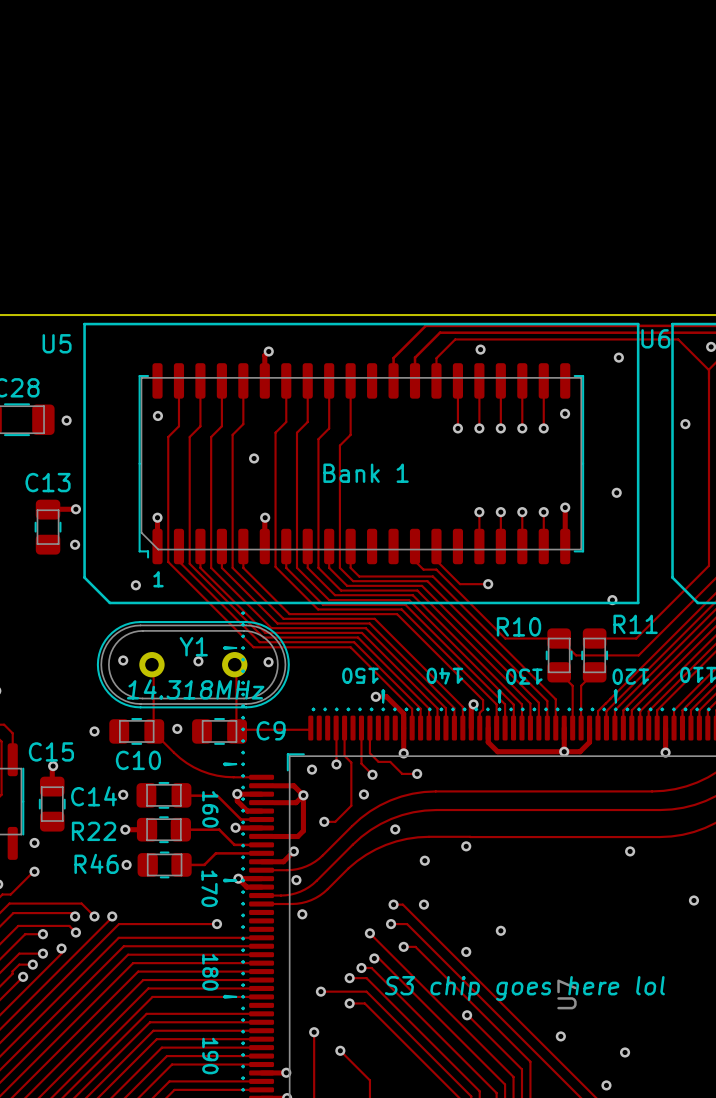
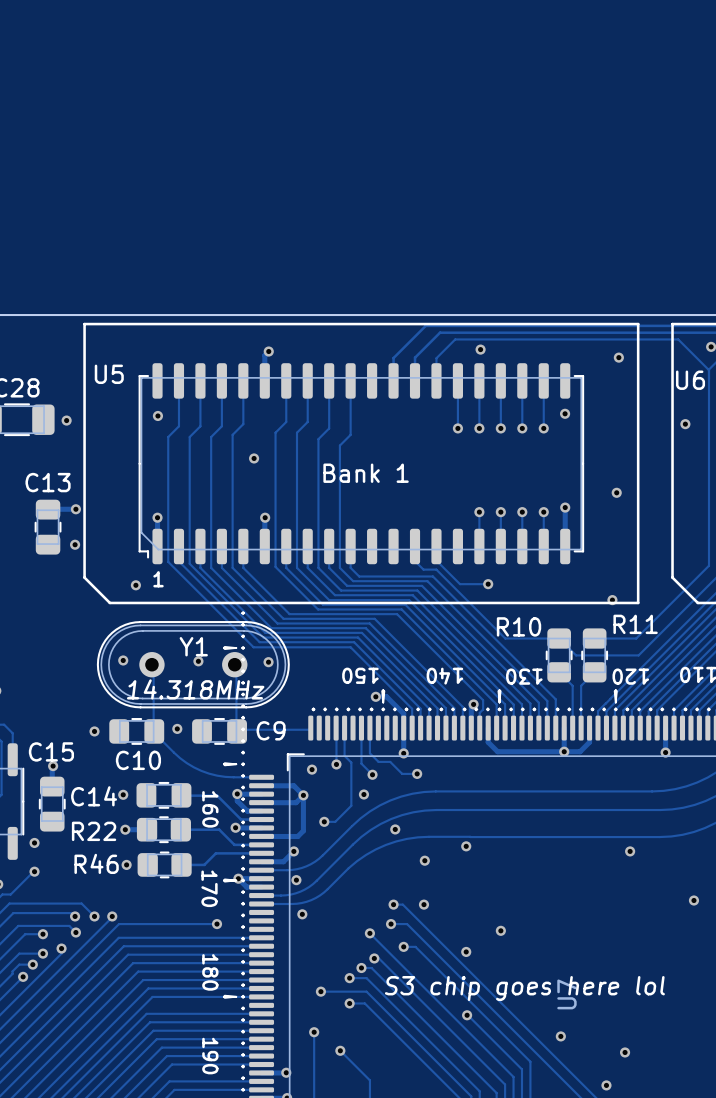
U6 name position: U6 (655, 338) -> U6 (690, 380)
U5 name position: U5 (57, 343) -> U5 (109, 374)

